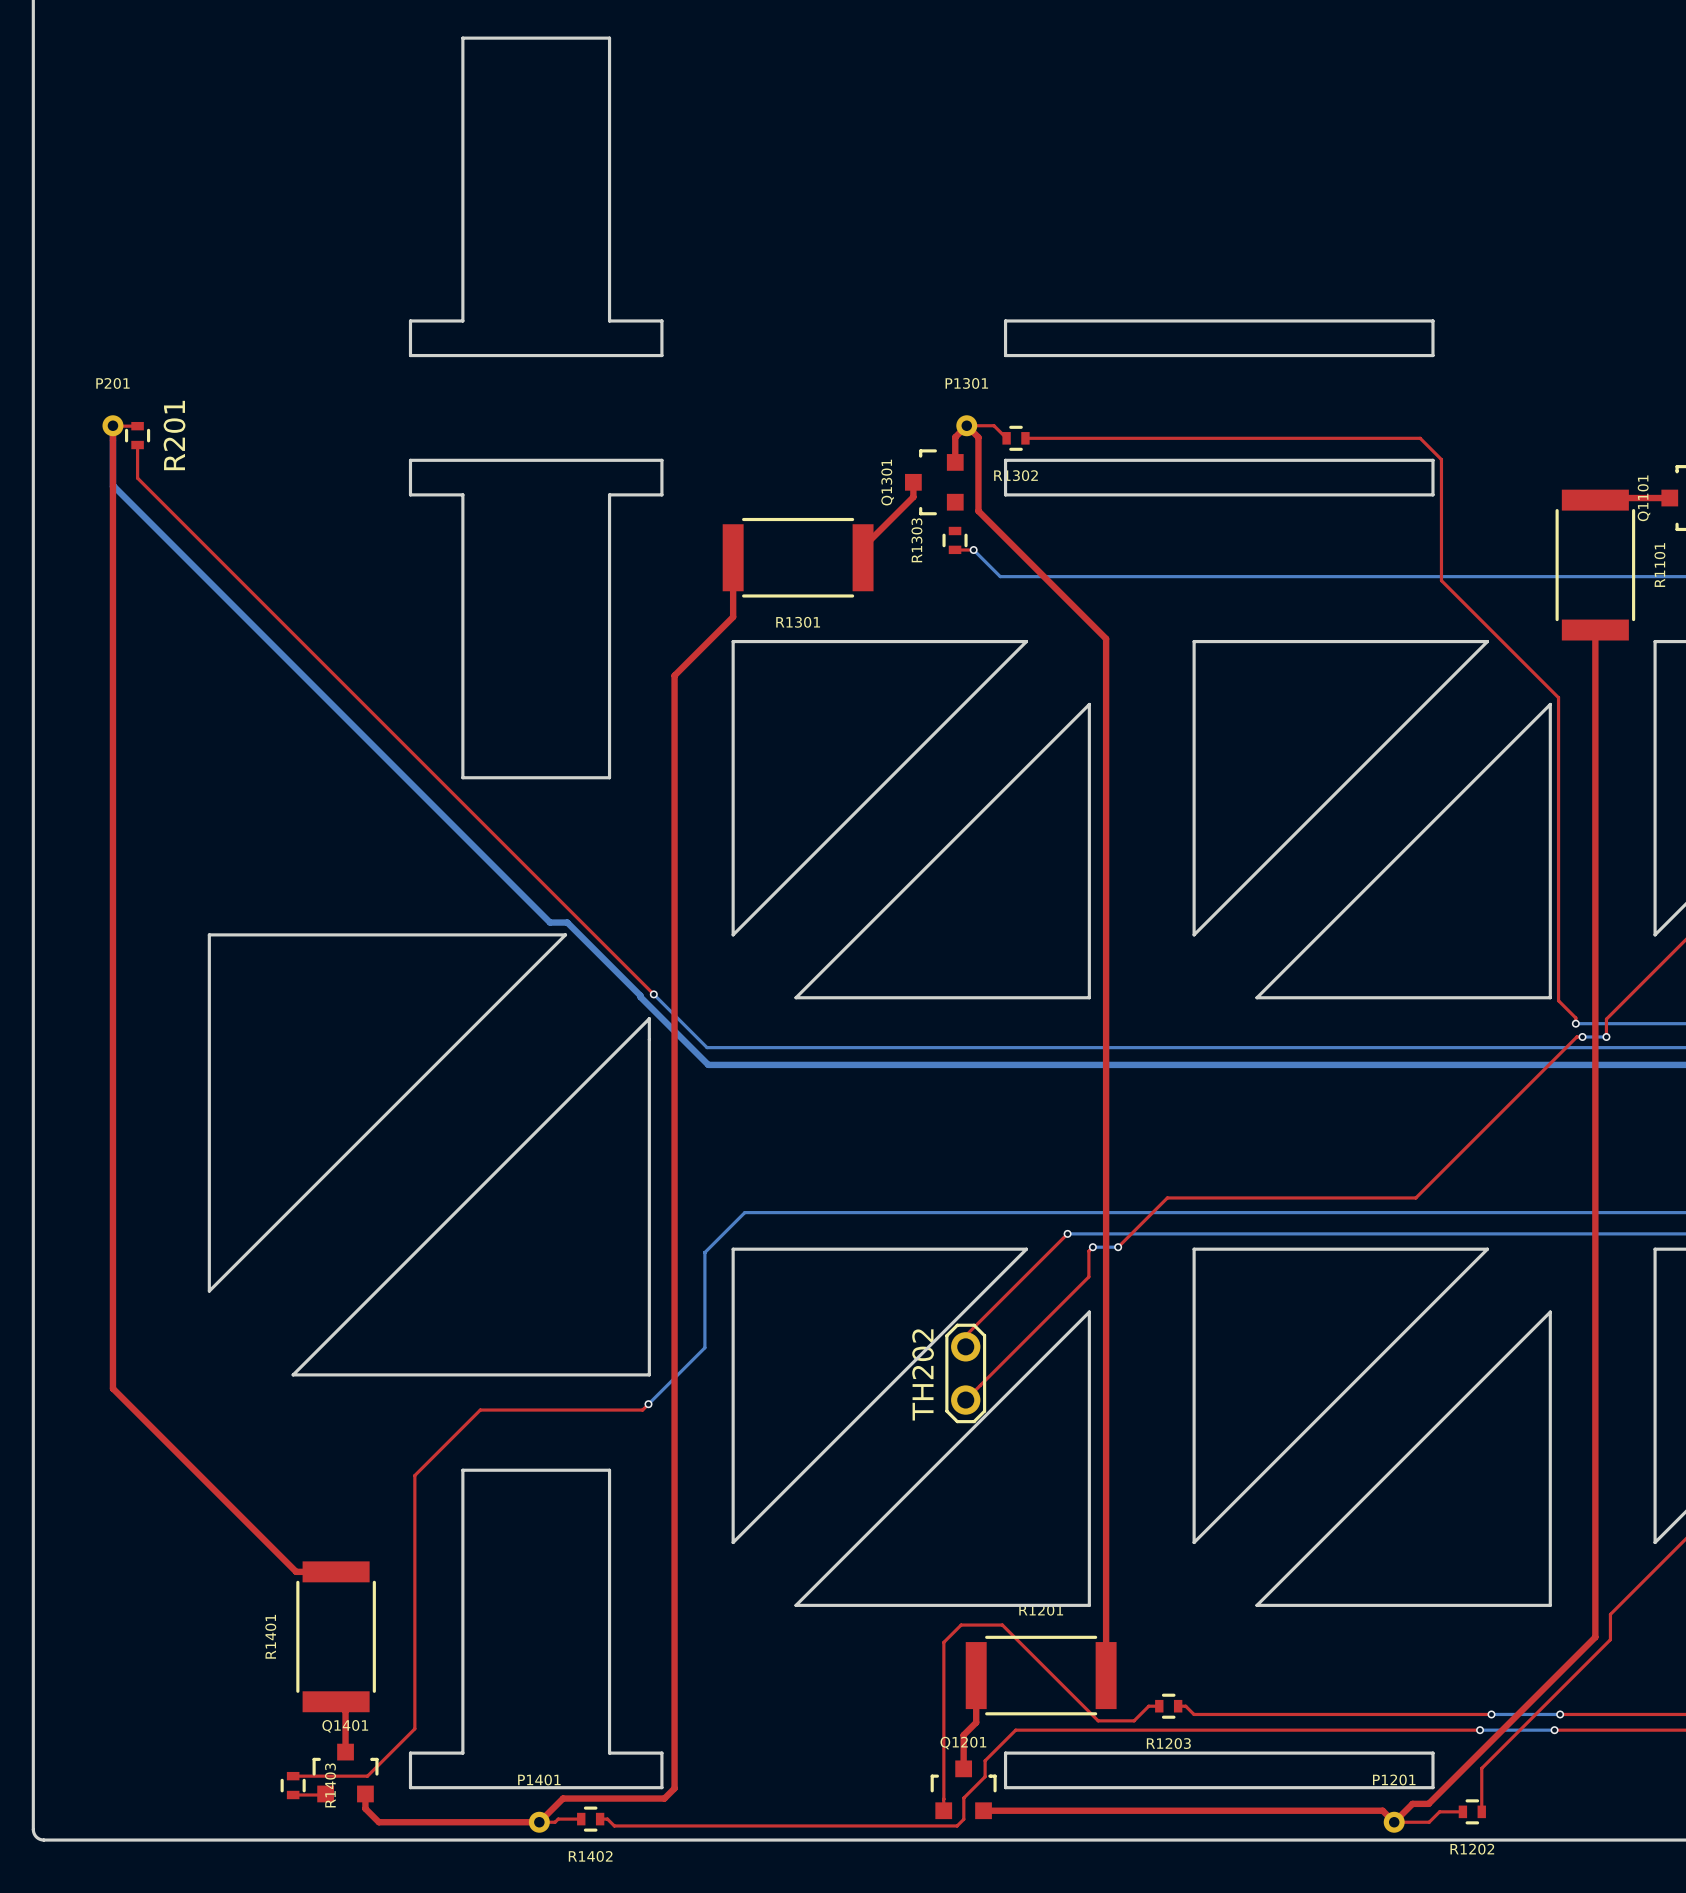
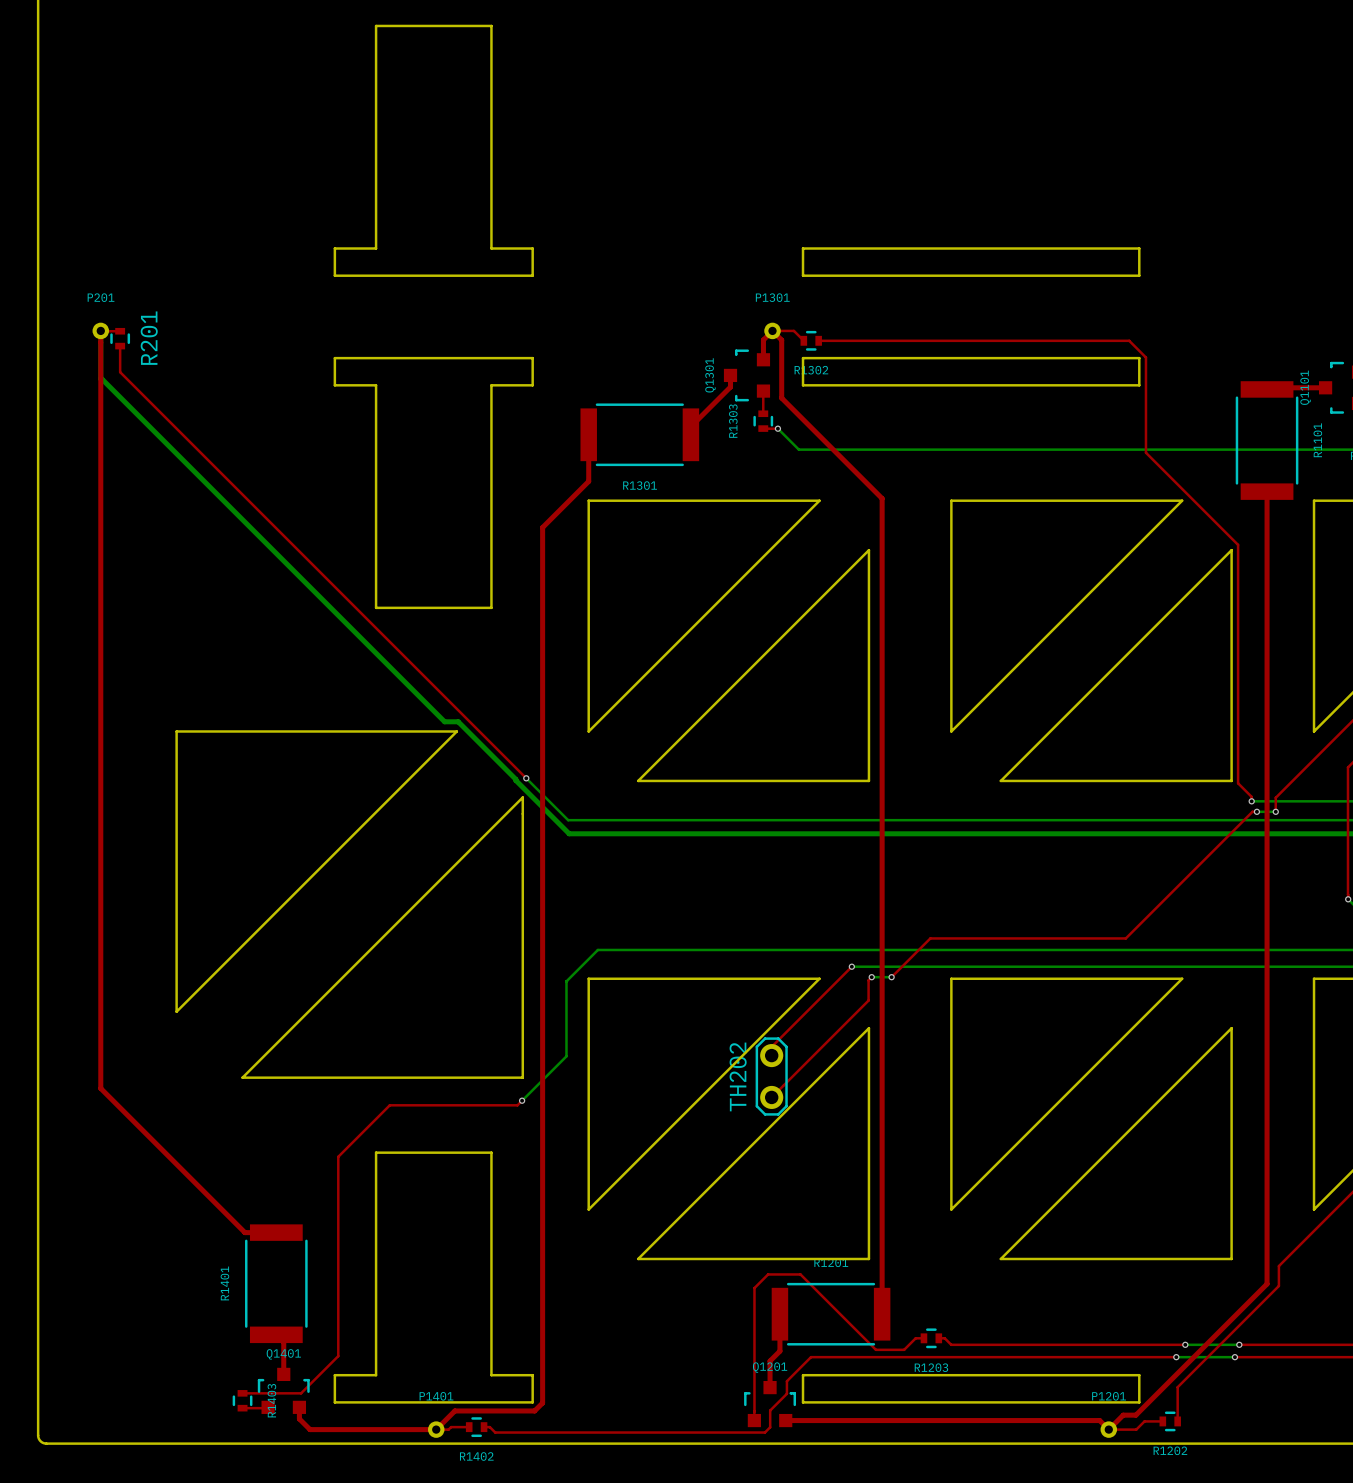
top track: none -> (763, 391) (763, 413)

